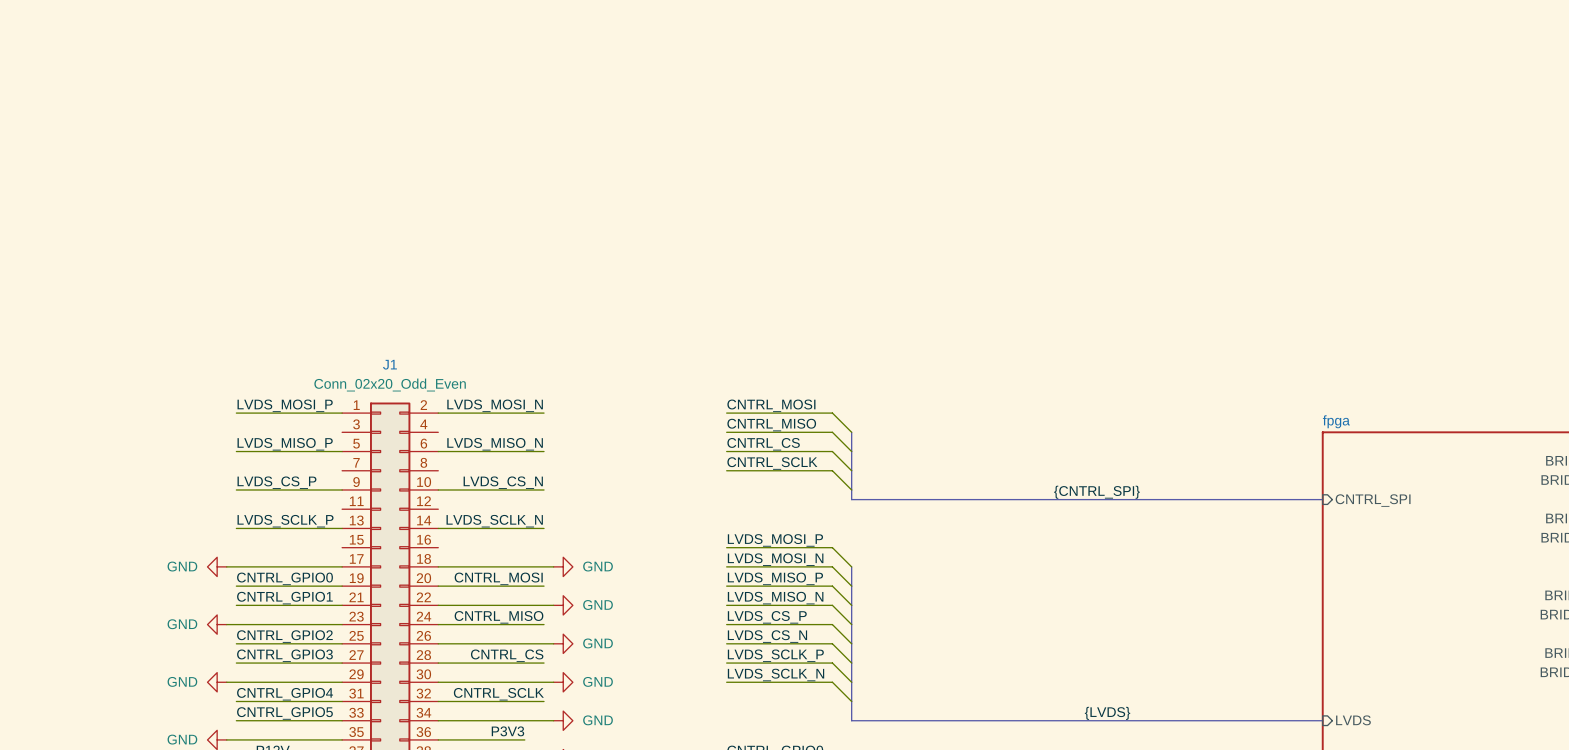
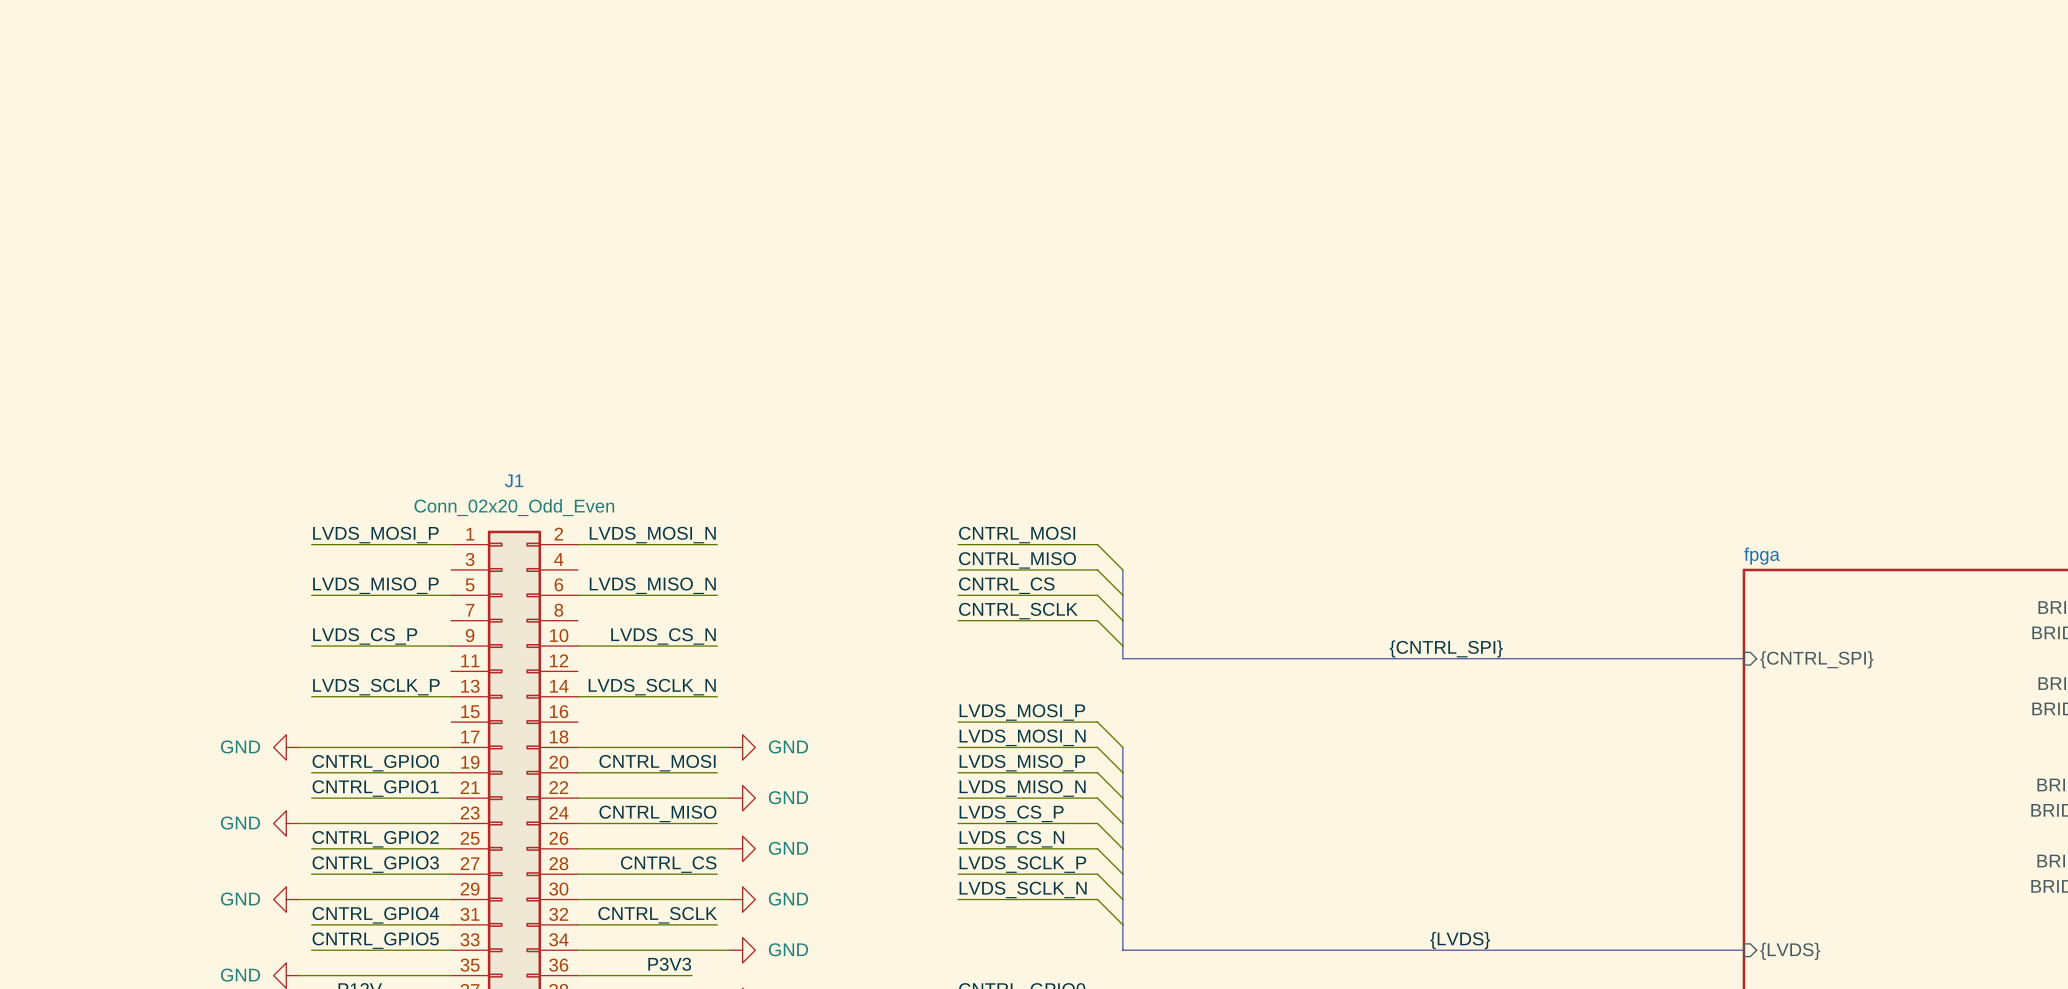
sheet pin: CNTRL_SPI (1373, 500) -> {CNTRL_SPI} (1816, 659)
sheet pin: LVDS (1353, 720) -> {LVDS} (1790, 951)

